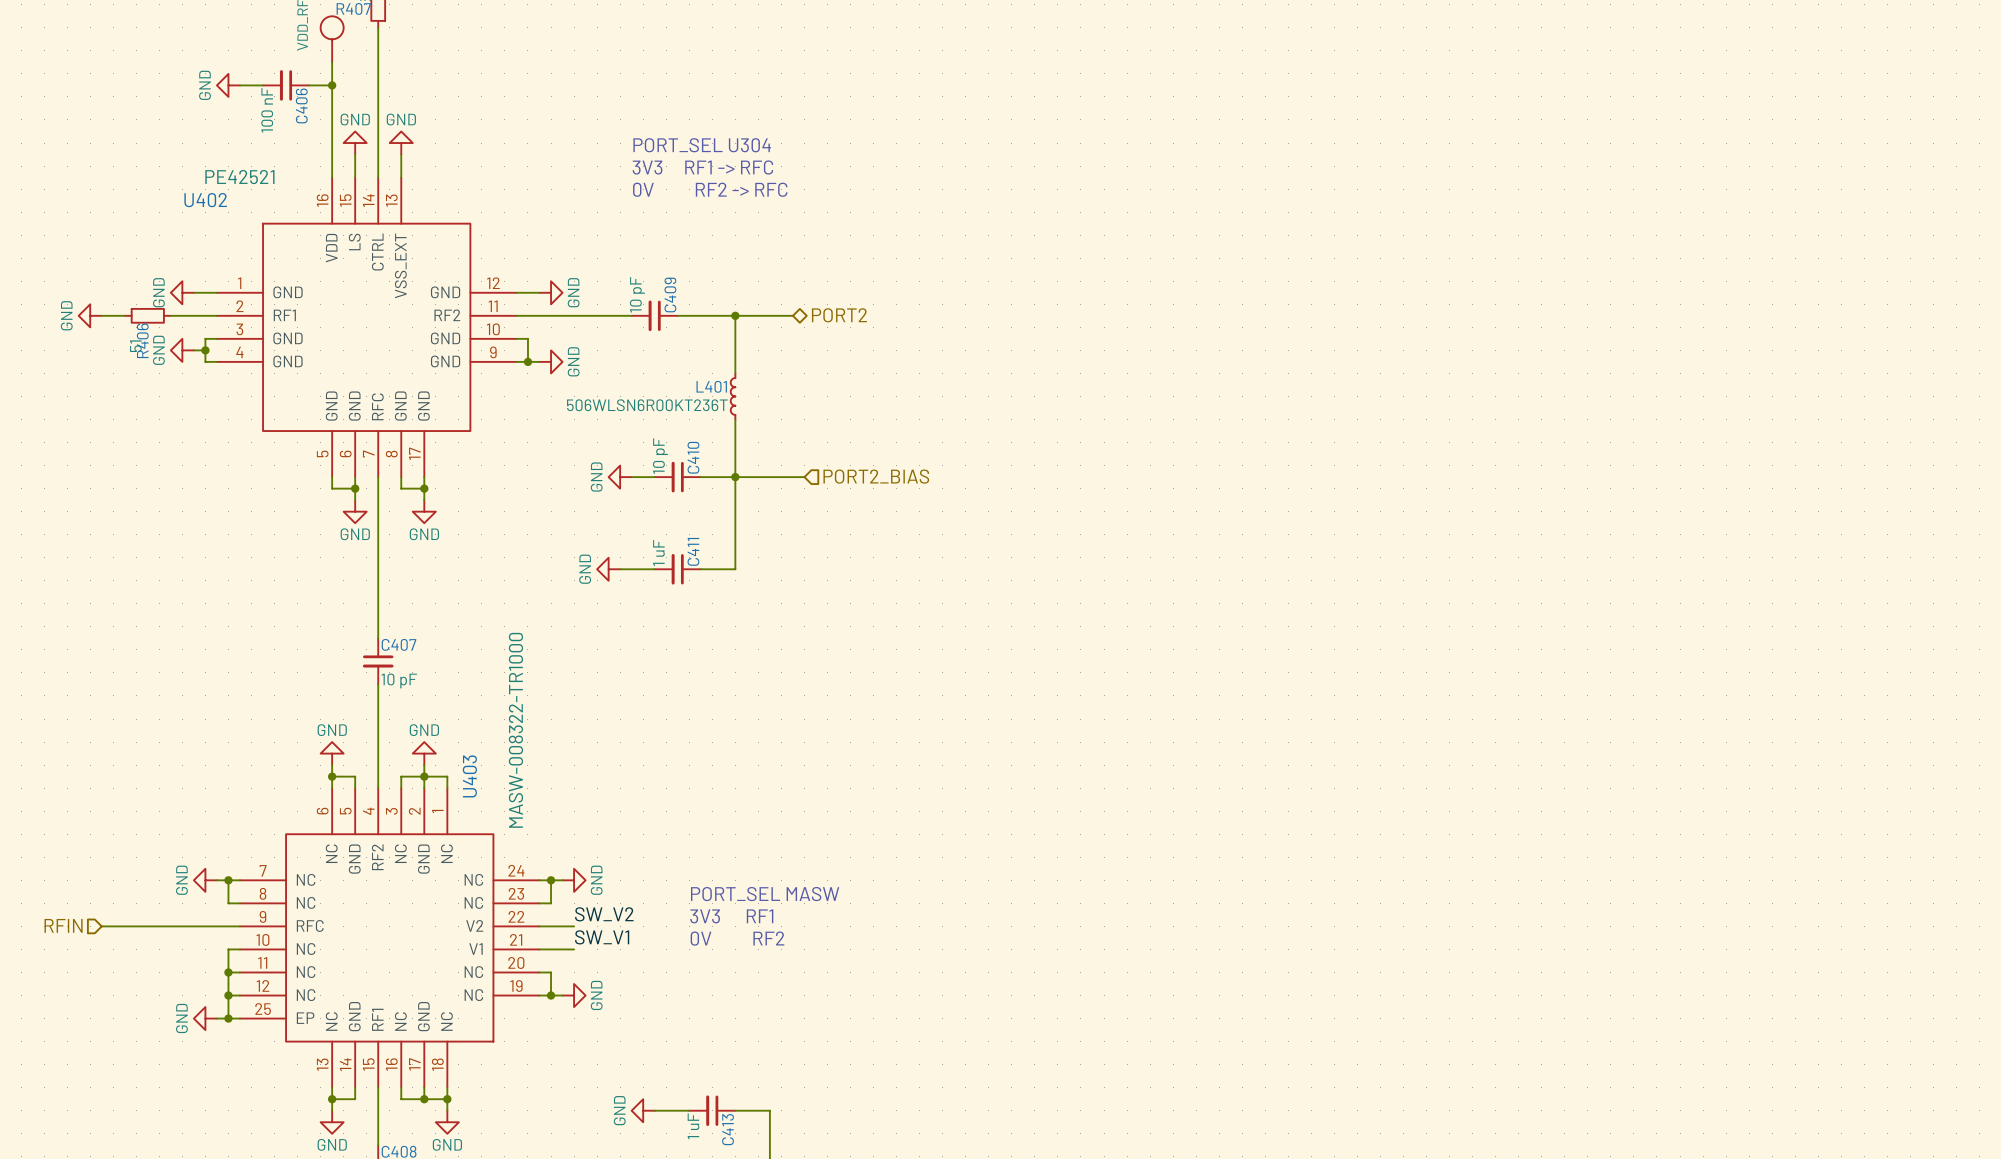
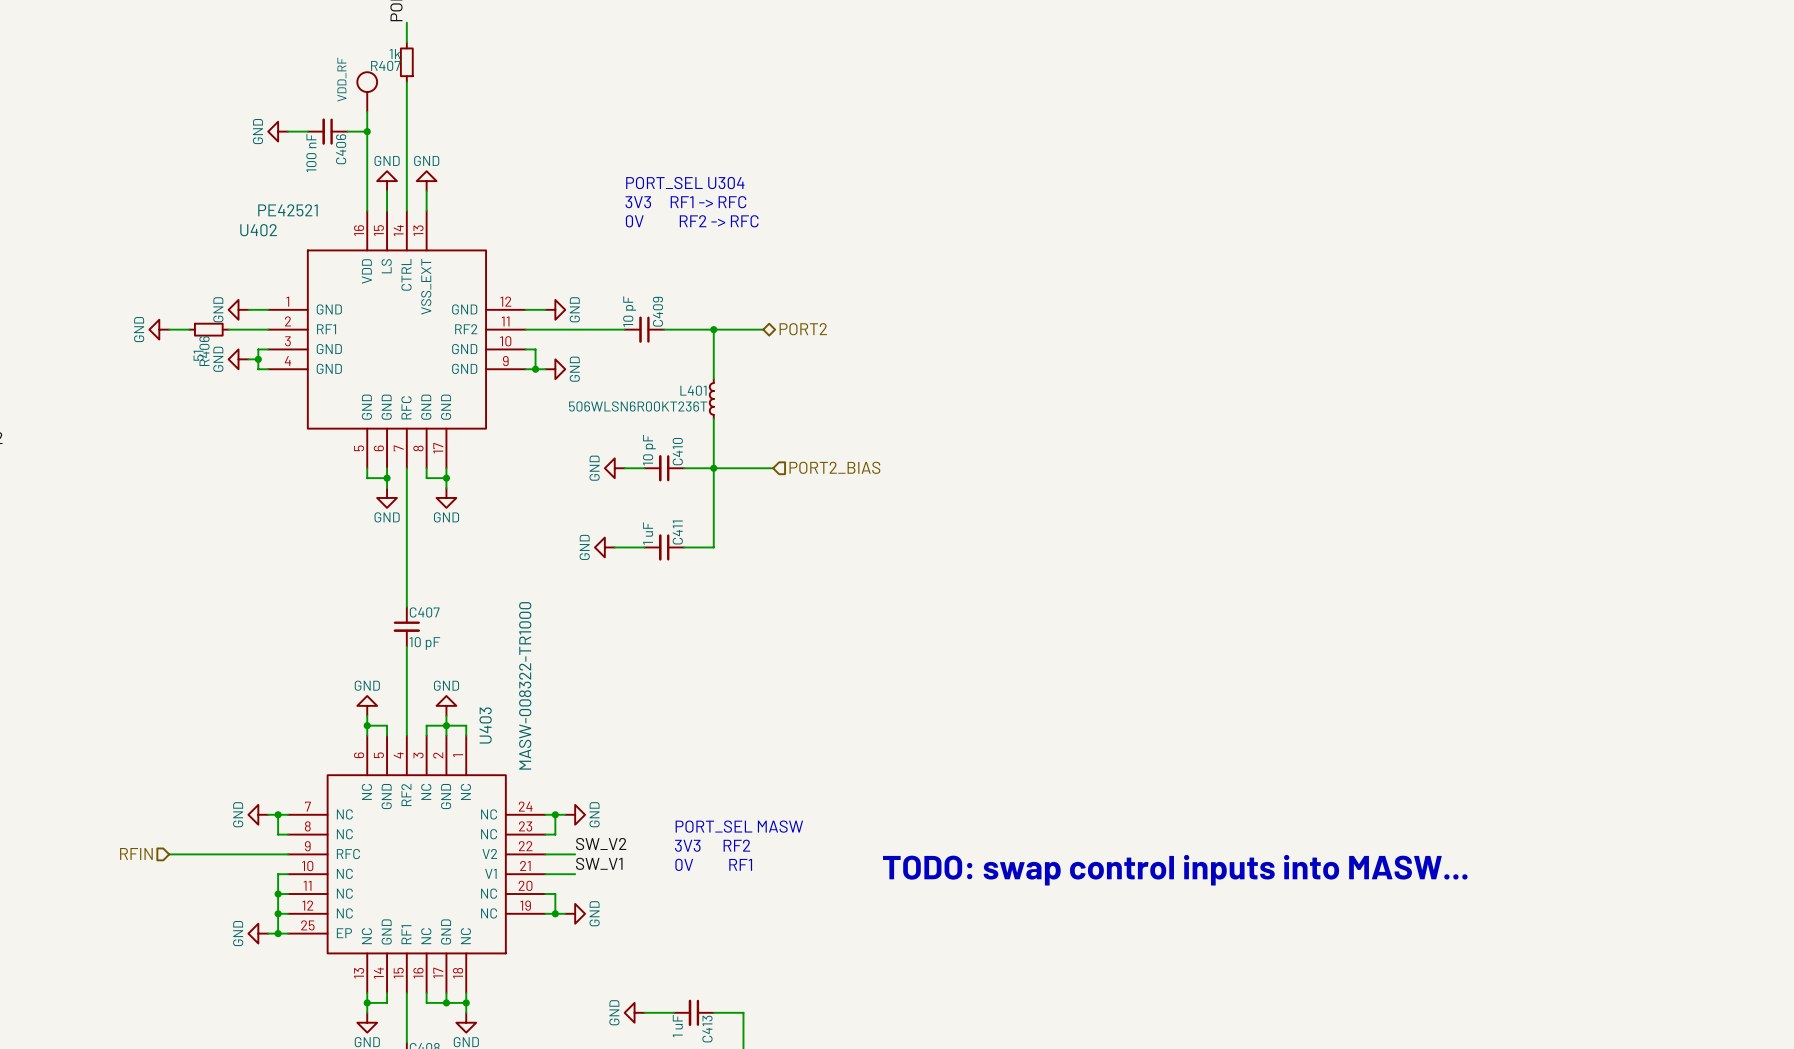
text: 3V3 RF1 (731, 916) -> 3V3 RF2 (712, 845)
text: 0V RF2 (737, 938) -> 0V RF1 (713, 864)
text: none -> TODO: swap control inputs into MASW... (1175, 870)

